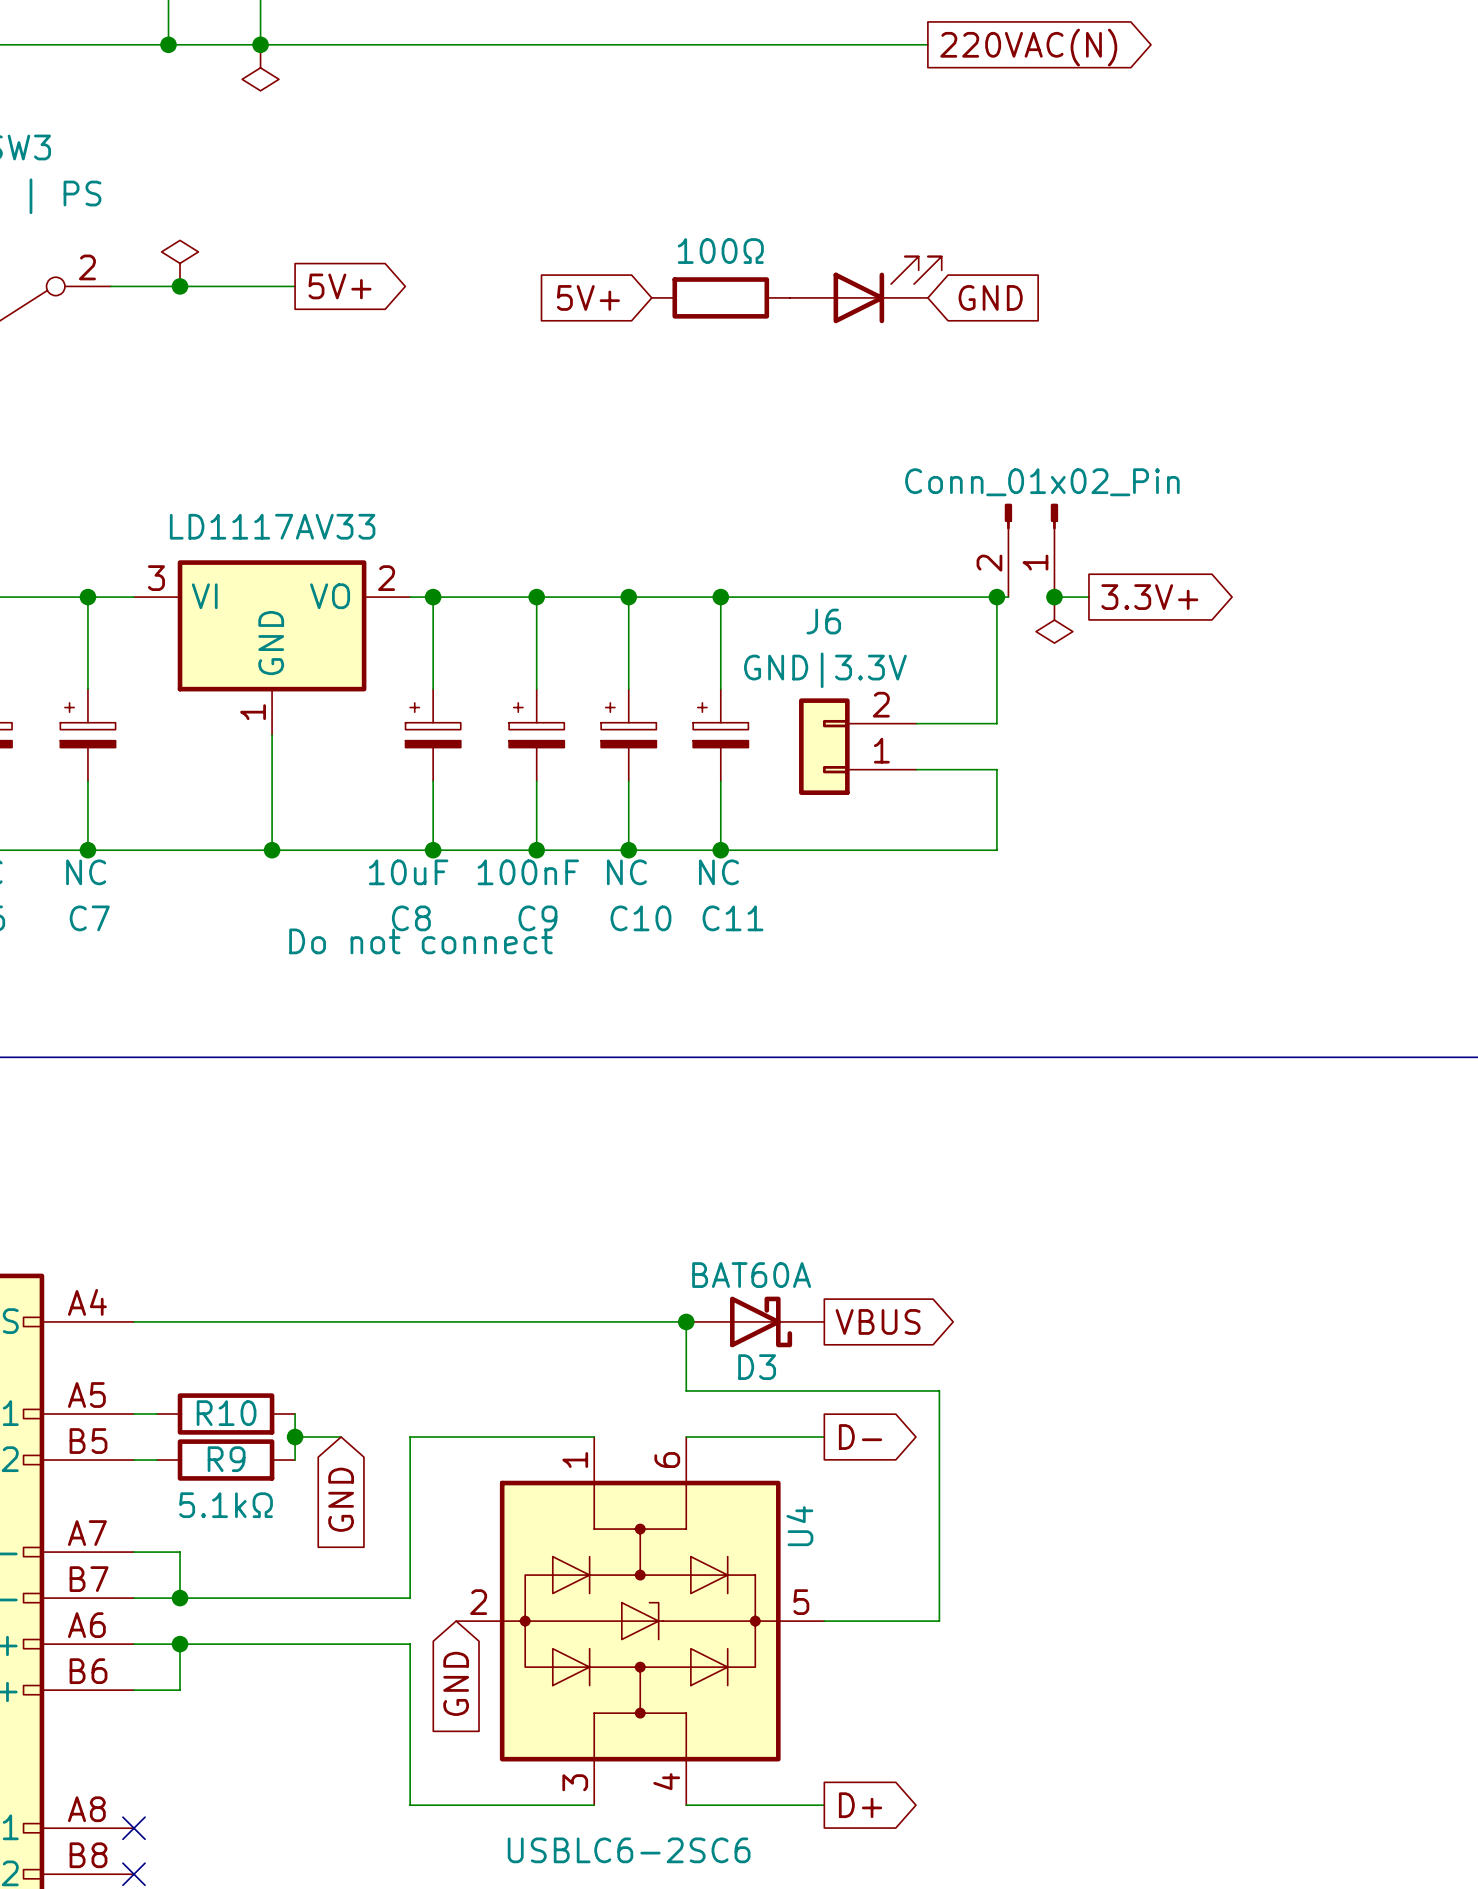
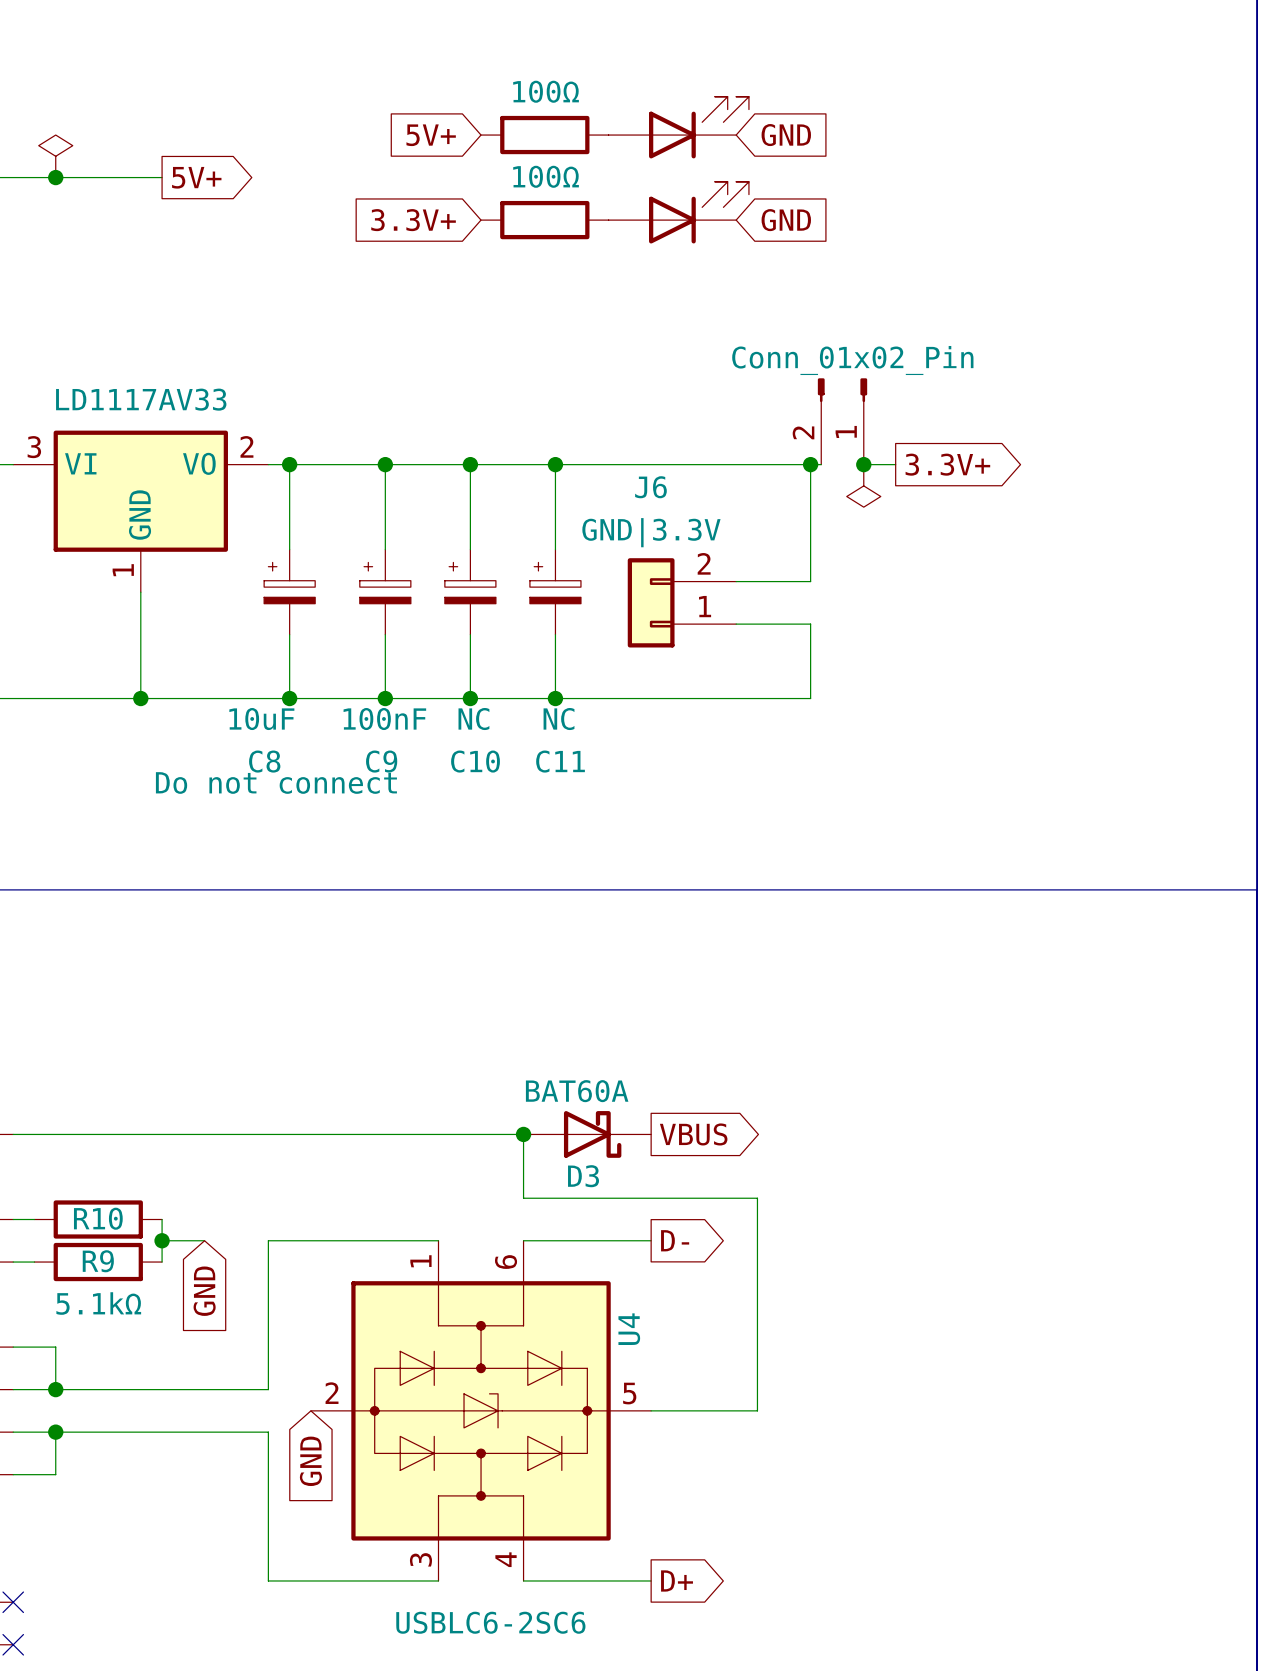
part: none -> (678, 127)
part: none -> 100Ω (544, 135)
global label: none -> GND (786, 135)
part: (865, 289) -> none
global label position: 5V+ (588, 297) -> 5V+ (431, 135)
part: 100Ω (720, 297) -> none
global label position: GND (990, 297) -> GND (786, 220)
part: none -> (678, 212)
global label: none -> 3.3V+ (413, 220)
part: none -> 100Ω (544, 220)

